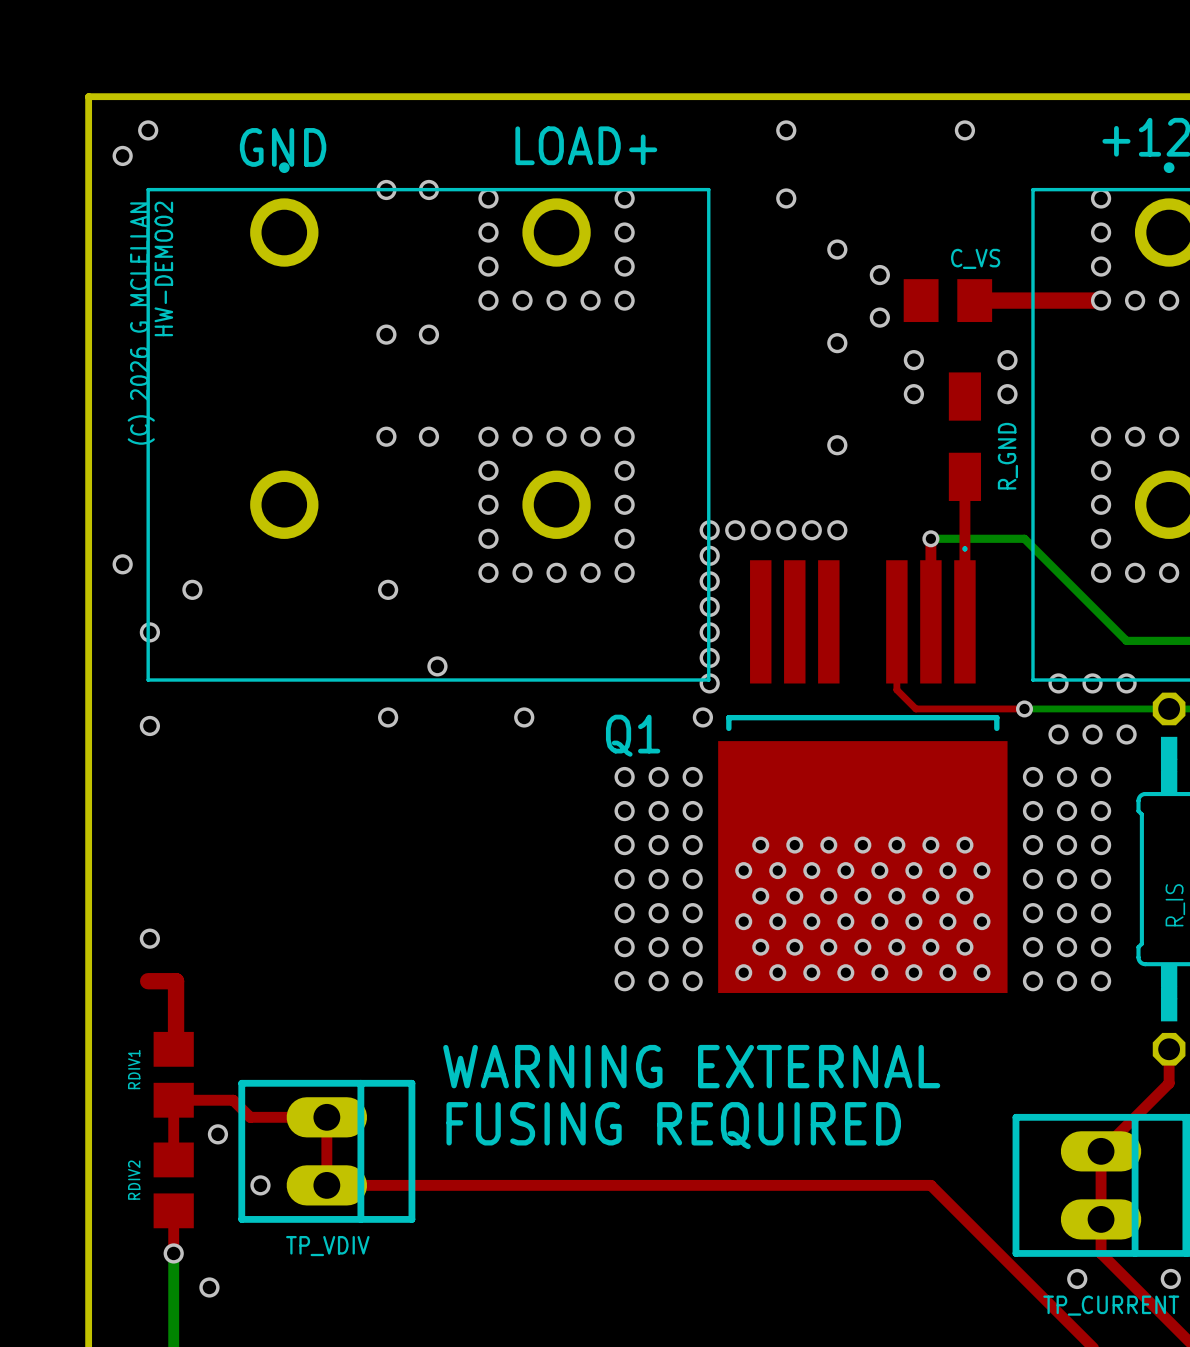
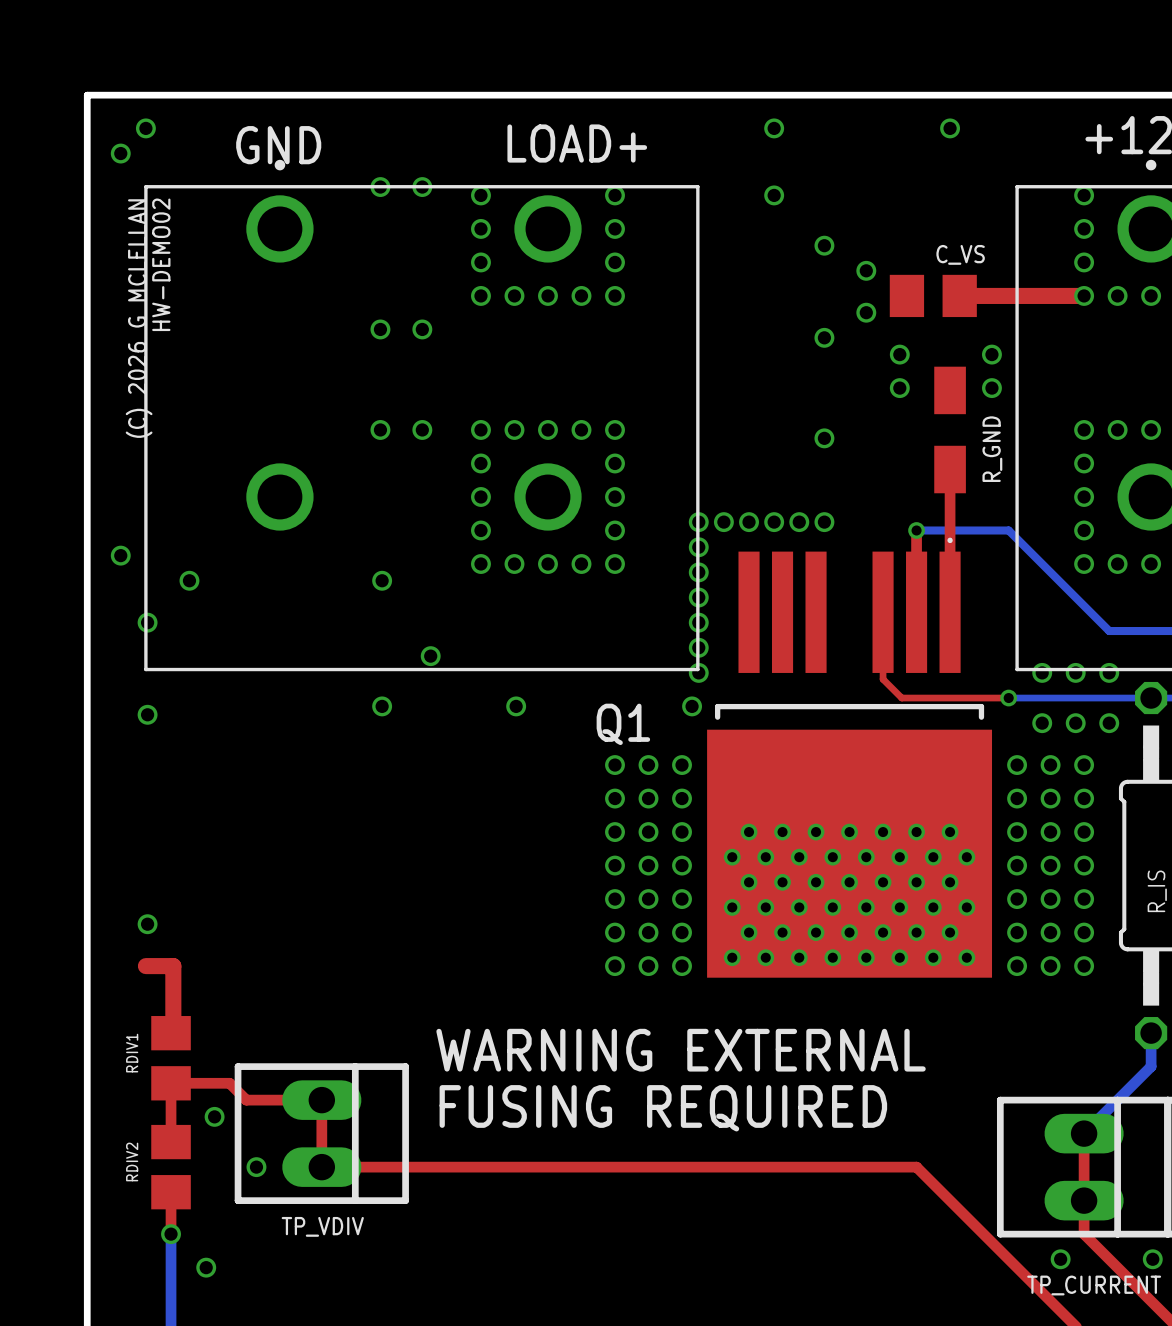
top track: (1169, 1049) (1169, 1083) (1101, 1151) -> none
bottom track: none -> (1151, 1033) (1151, 1066) (1084, 1133)

